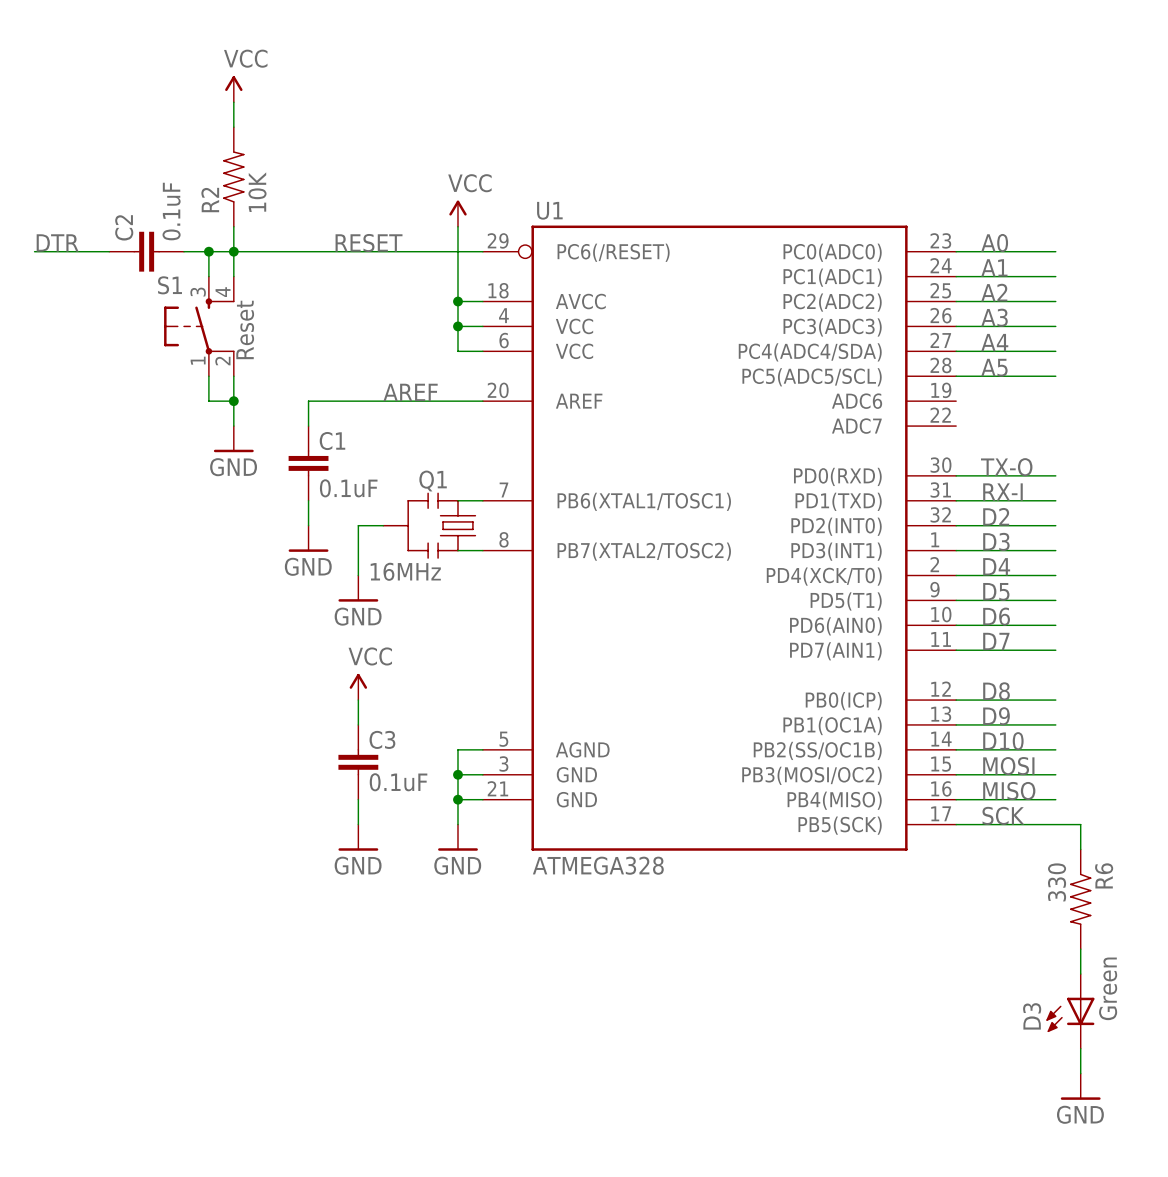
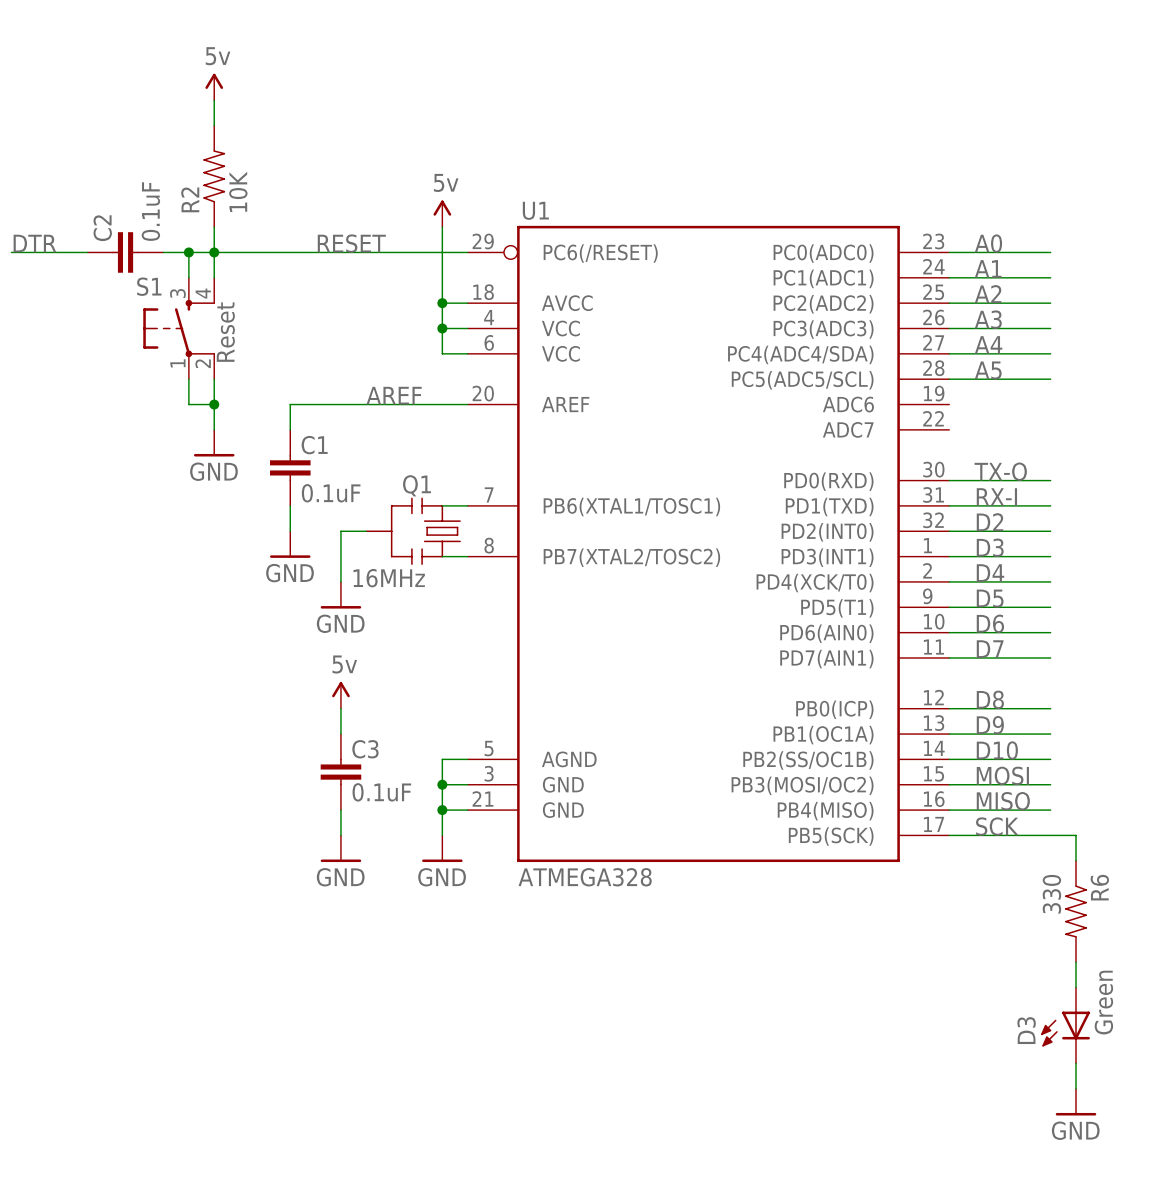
power symbol: VCC (233, 89) -> 5v (214, 87)
power symbol: VCC (457, 213) -> 5v (442, 213)
power symbol: VCC (358, 686) -> 5v (340, 695)

